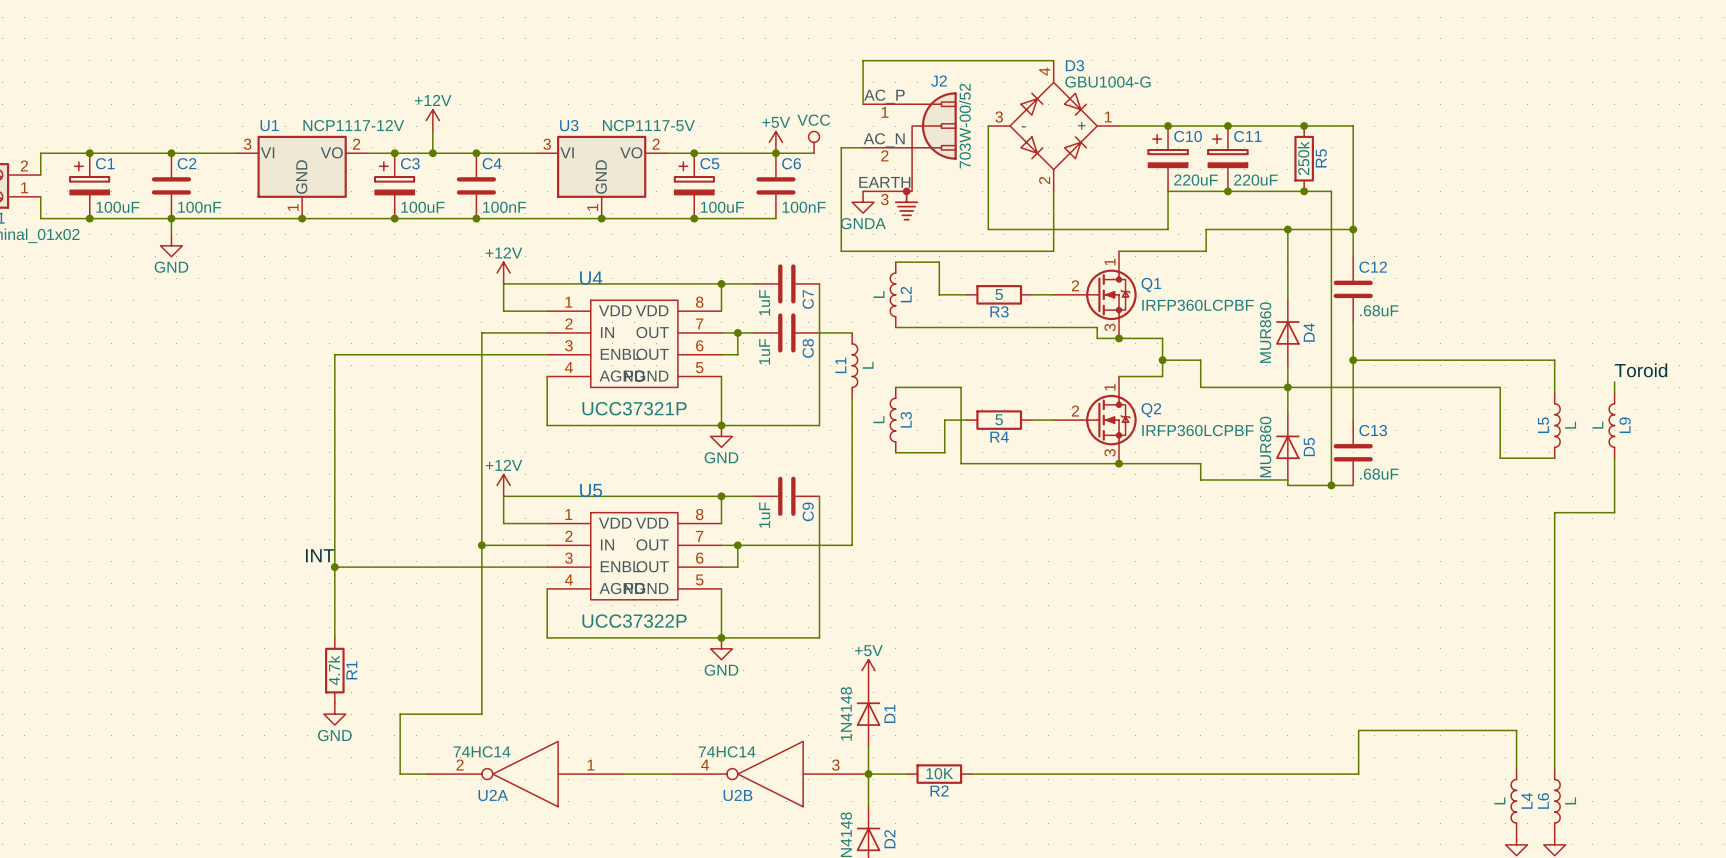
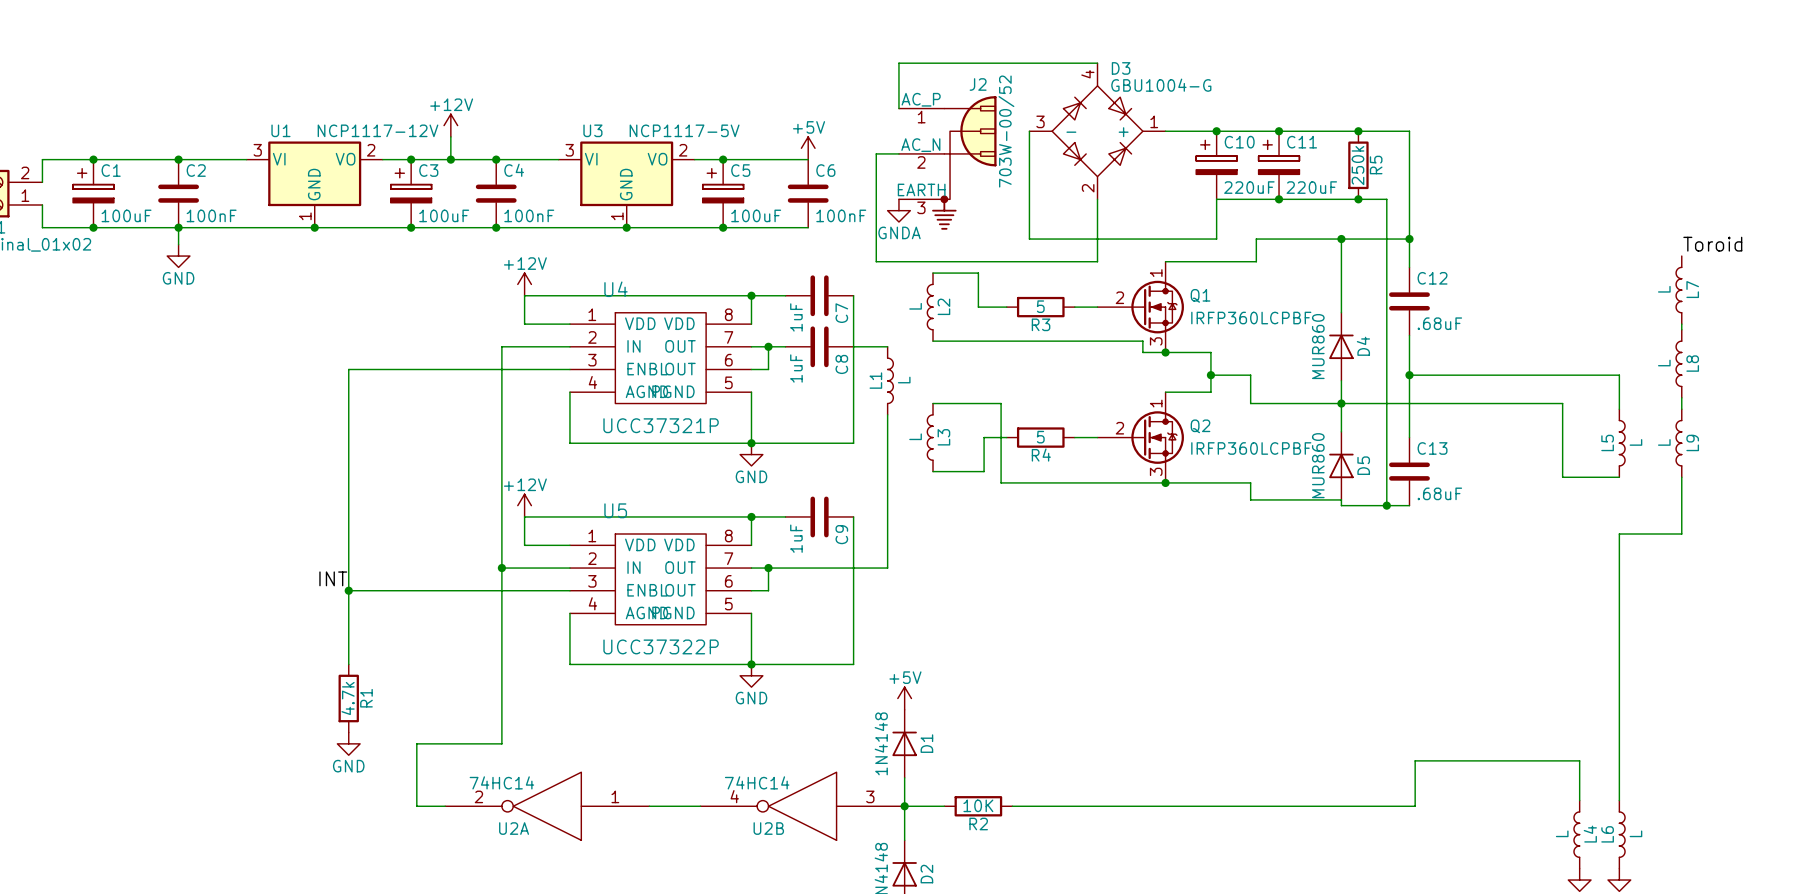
power symbol: VCC (814, 142) -> none
wire: (775, 153) (814, 153) -> none
junction: (775, 153) -> none
L7: none -> L (1678, 290)
wire: none -> (1681, 324) (1681, 329)
L8: none -> L (1678, 363)
label position: Toroid (1641, 370) -> Toroid (1712, 244)

